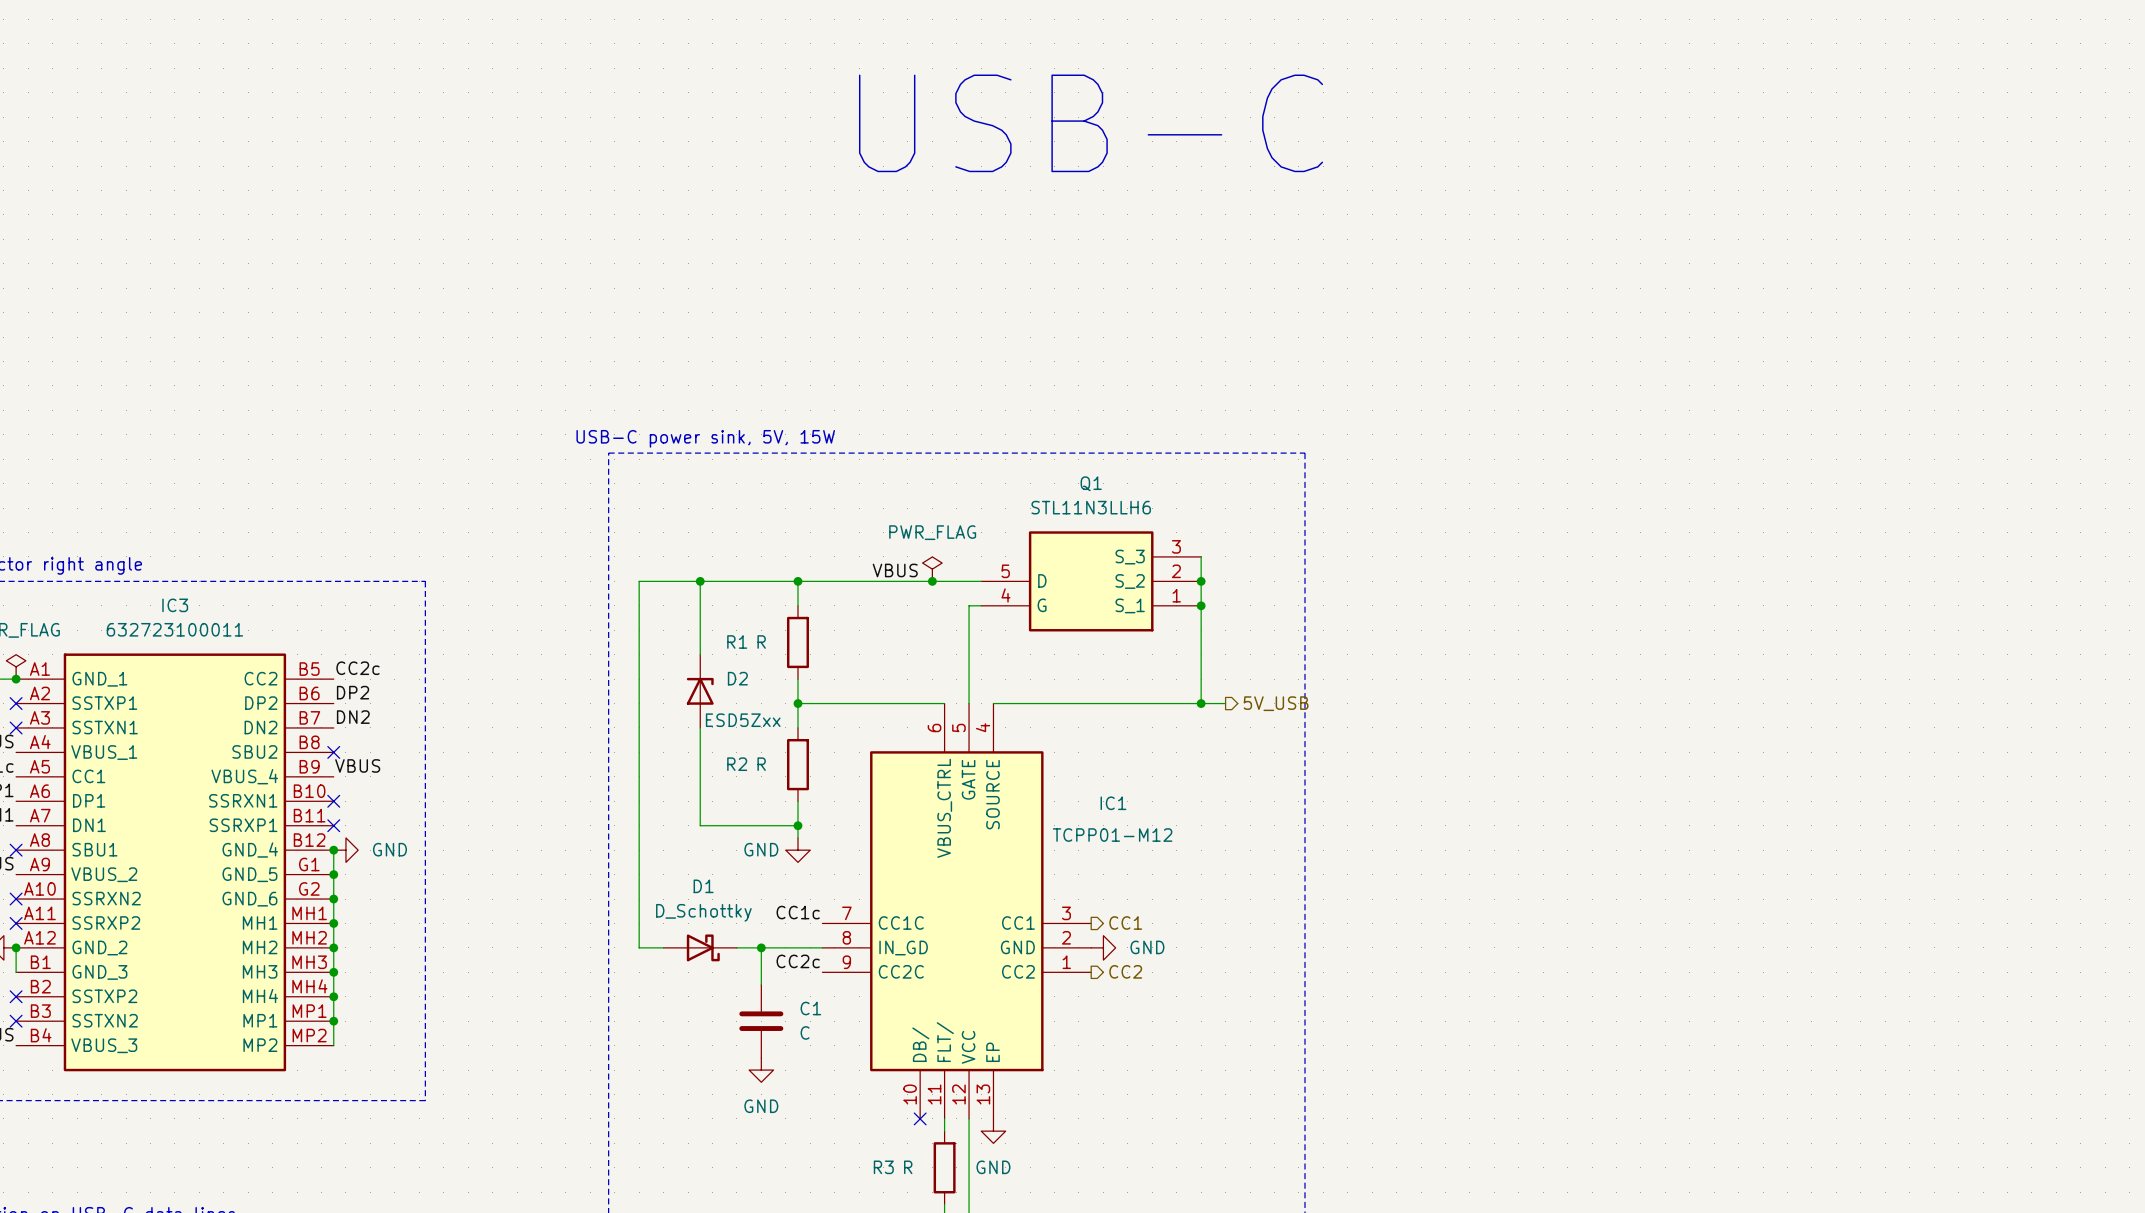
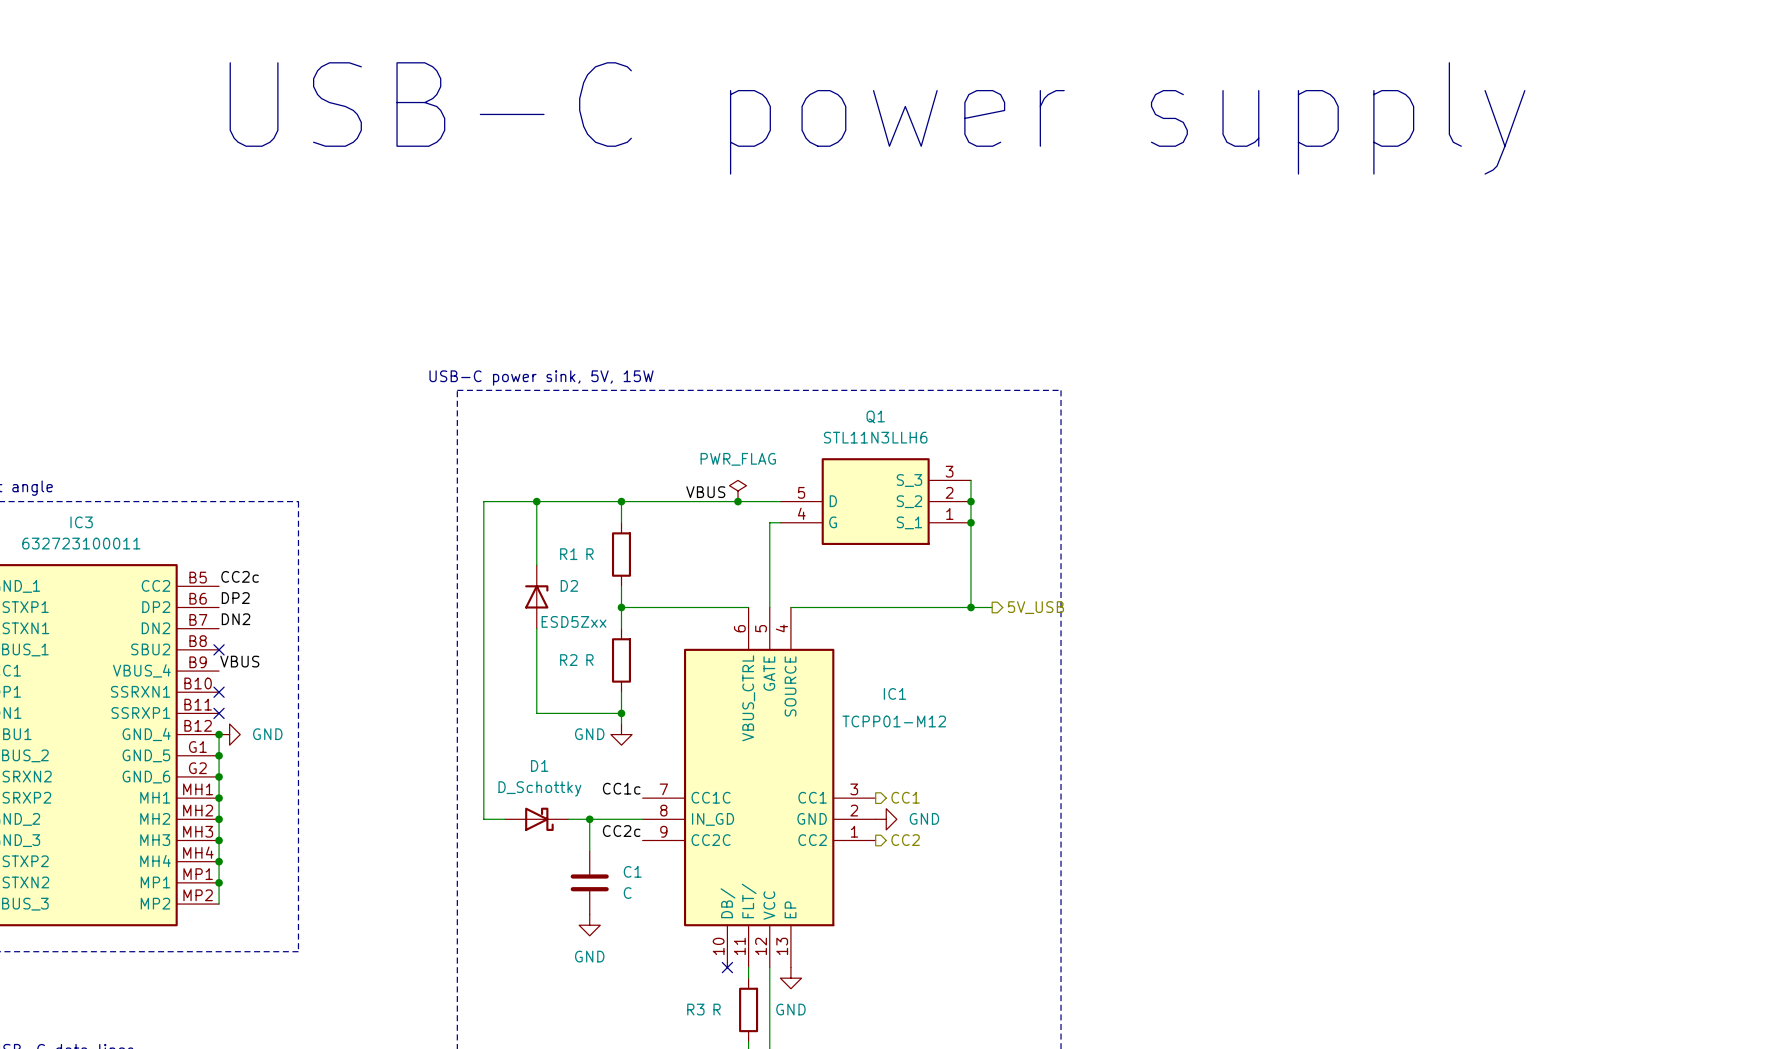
text: USB-C (1091, 123) -> USB-C power supply (877, 118)

